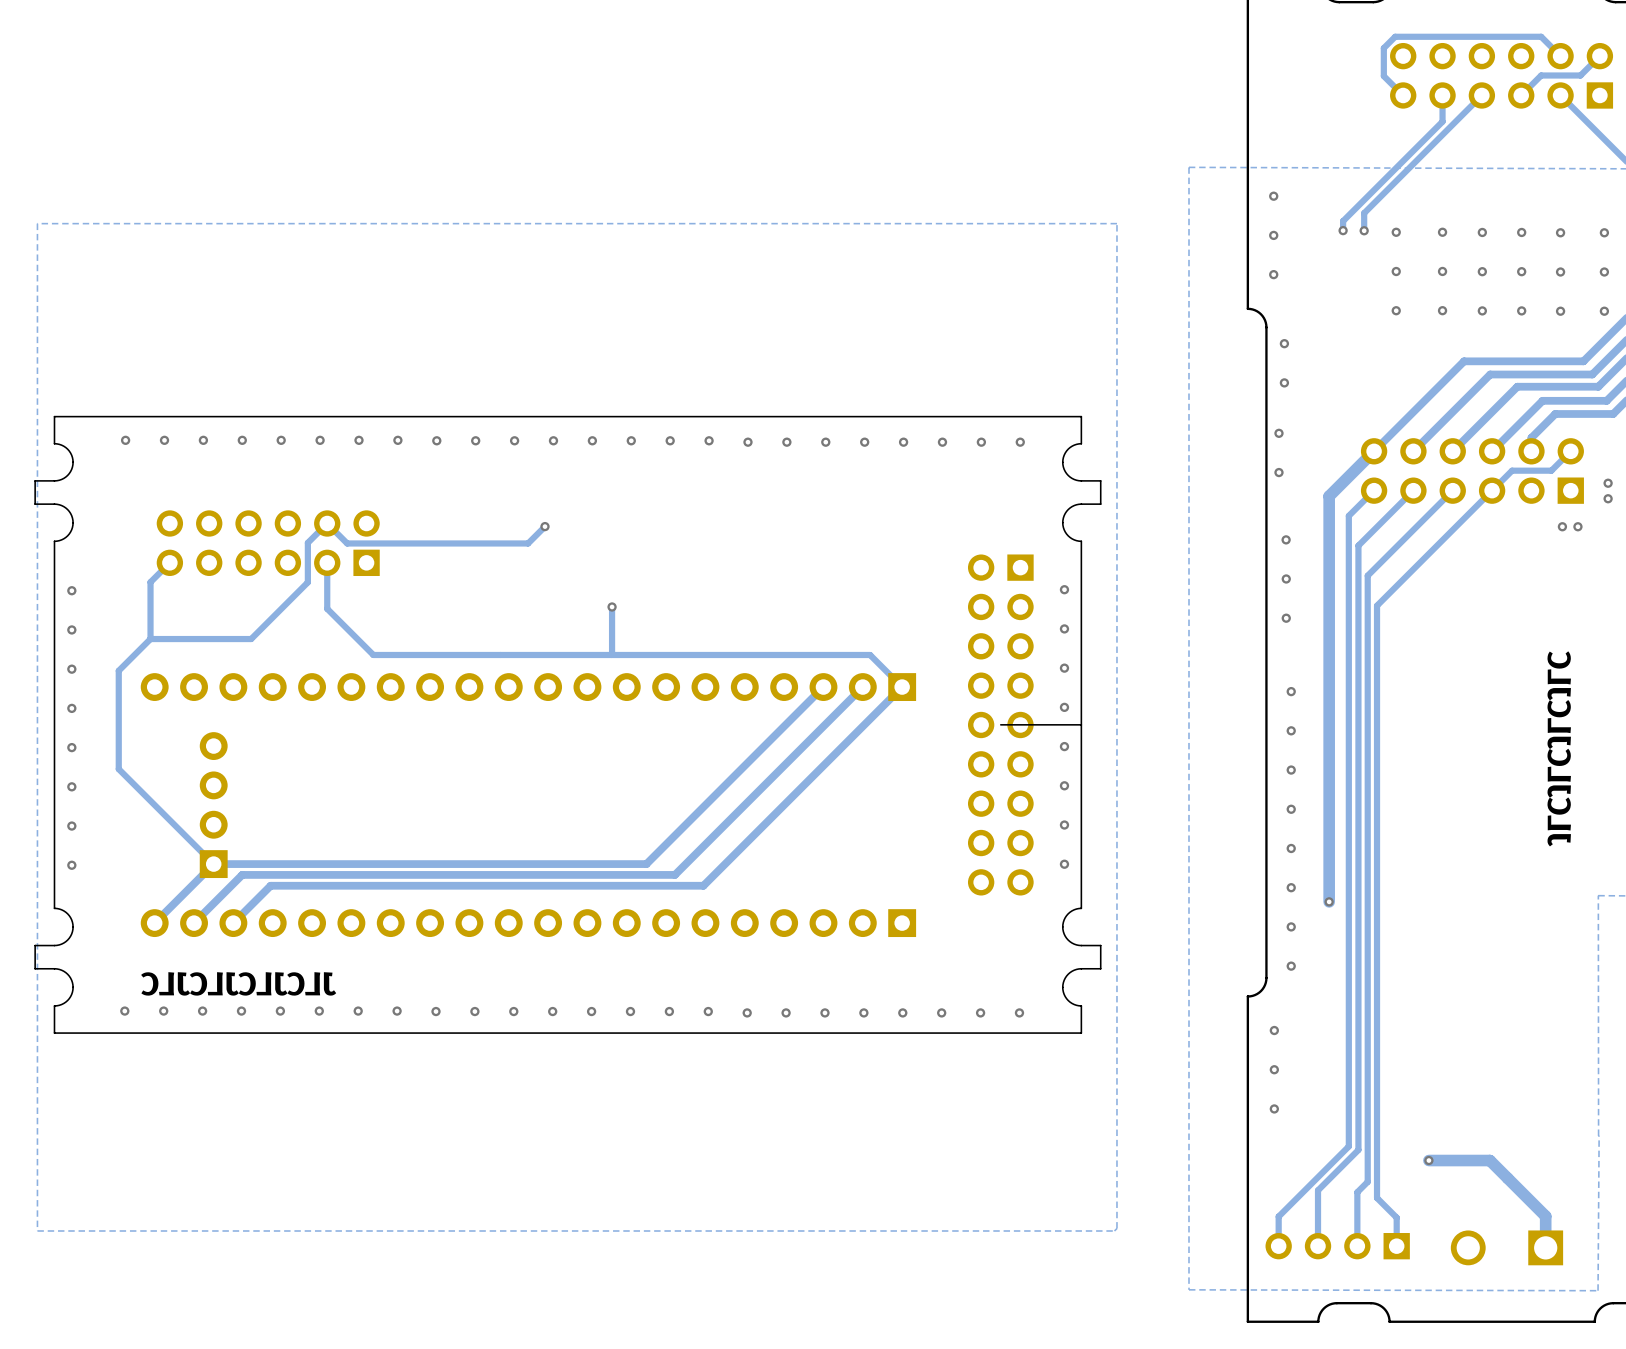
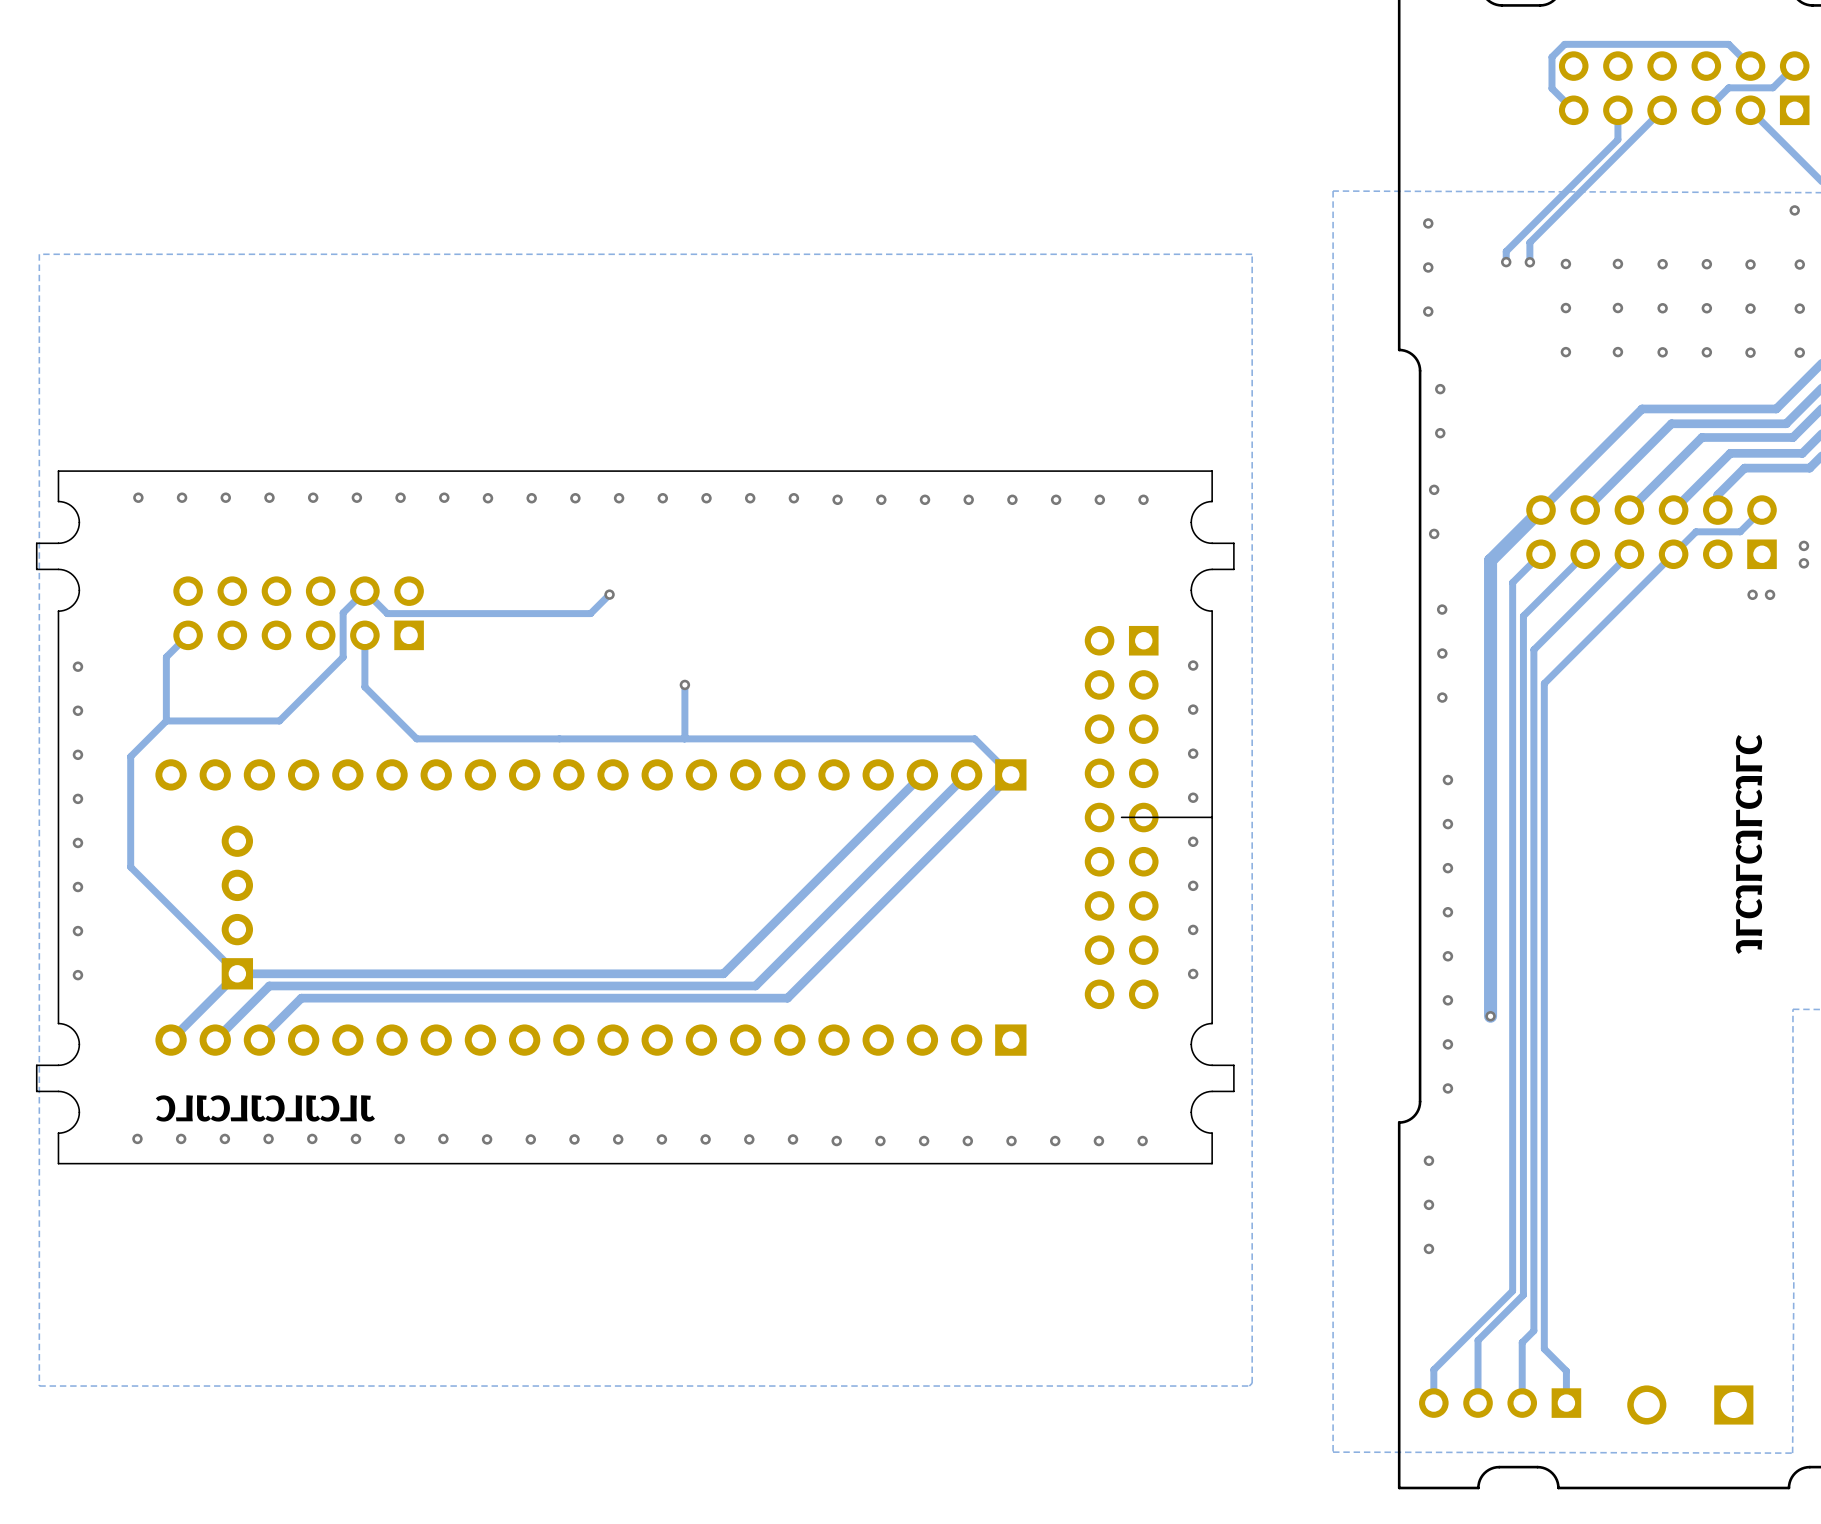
via: none -> (1794, 210)
track: (1428, 1160) (1489, 1160) (1545, 1216) (1545, 1247) -> none
via: (1428, 1160) -> none

